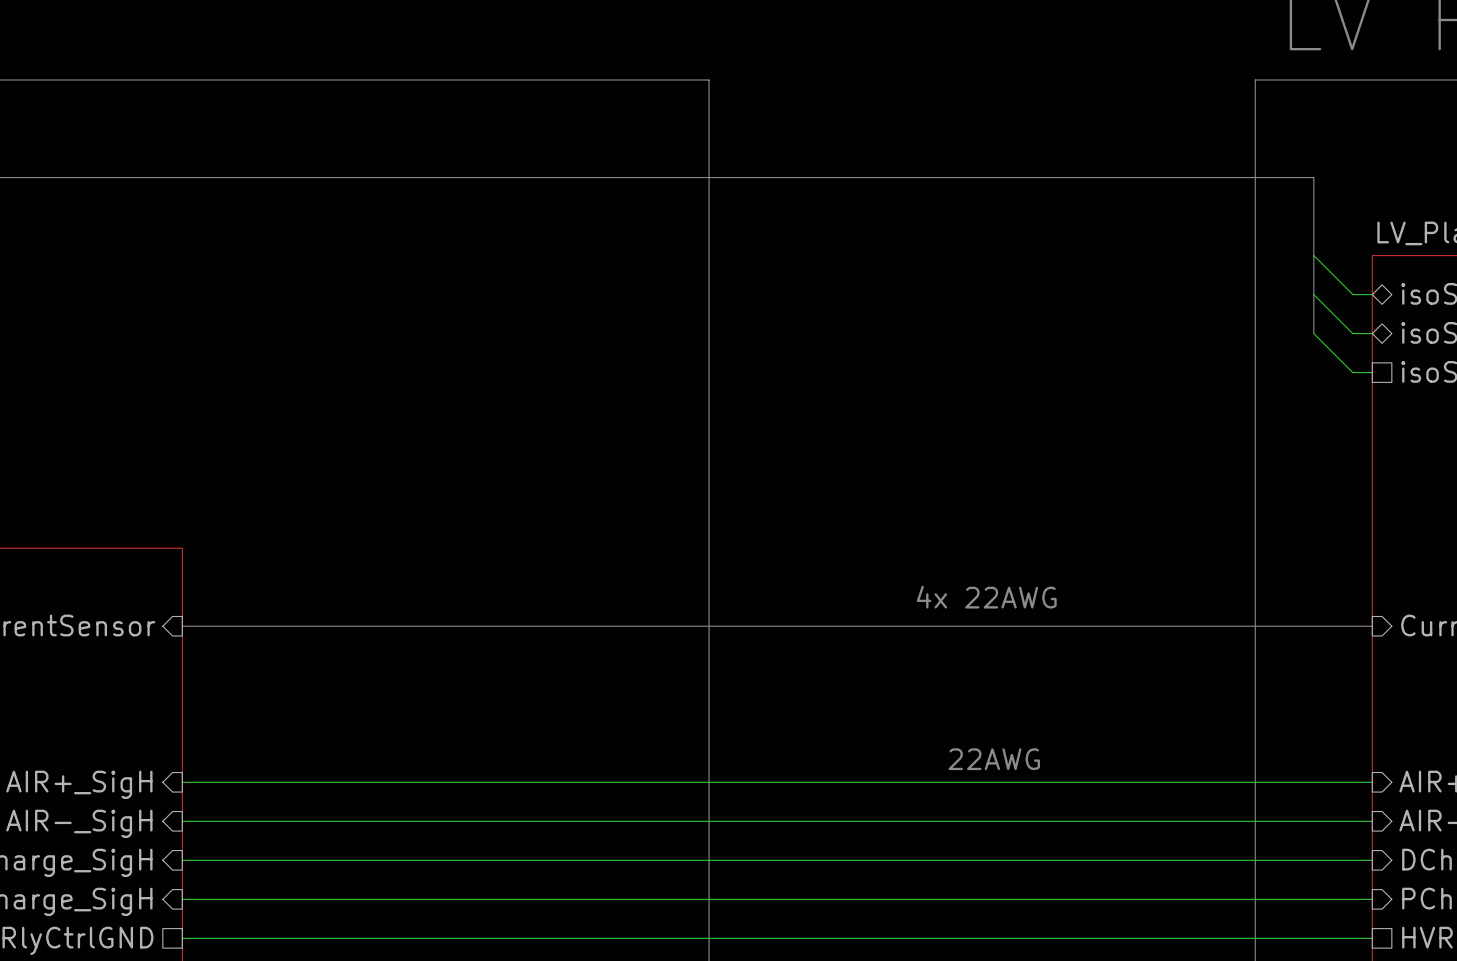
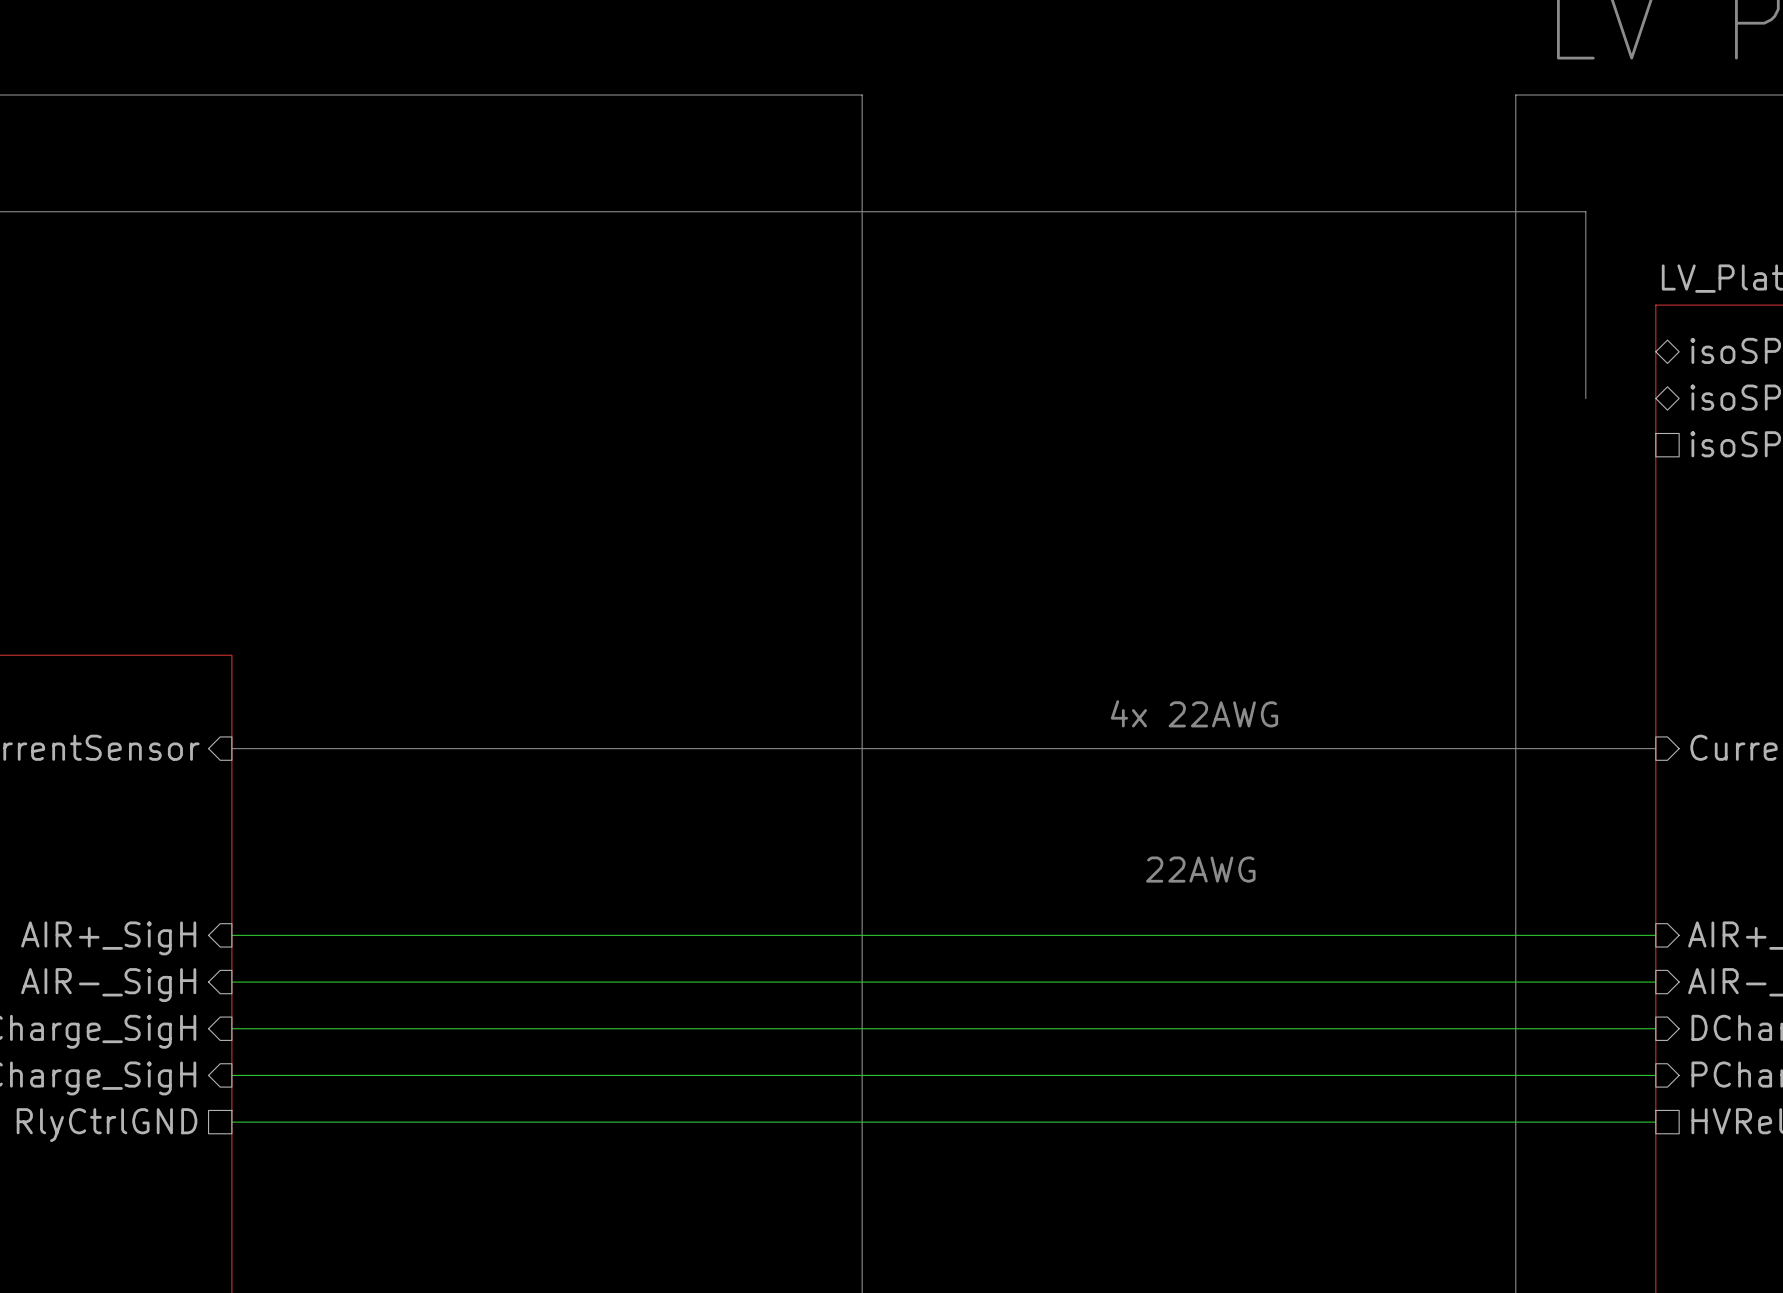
wire: (1313, 255) (1352, 294) (1372, 294) -> none
wire: (1313, 294) (1352, 333) (1372, 333) -> none
wire: (1313, 333) (1352, 372) (1372, 372) -> none
text position: 22AWG (994, 759) -> 22AWG (1200, 869)

